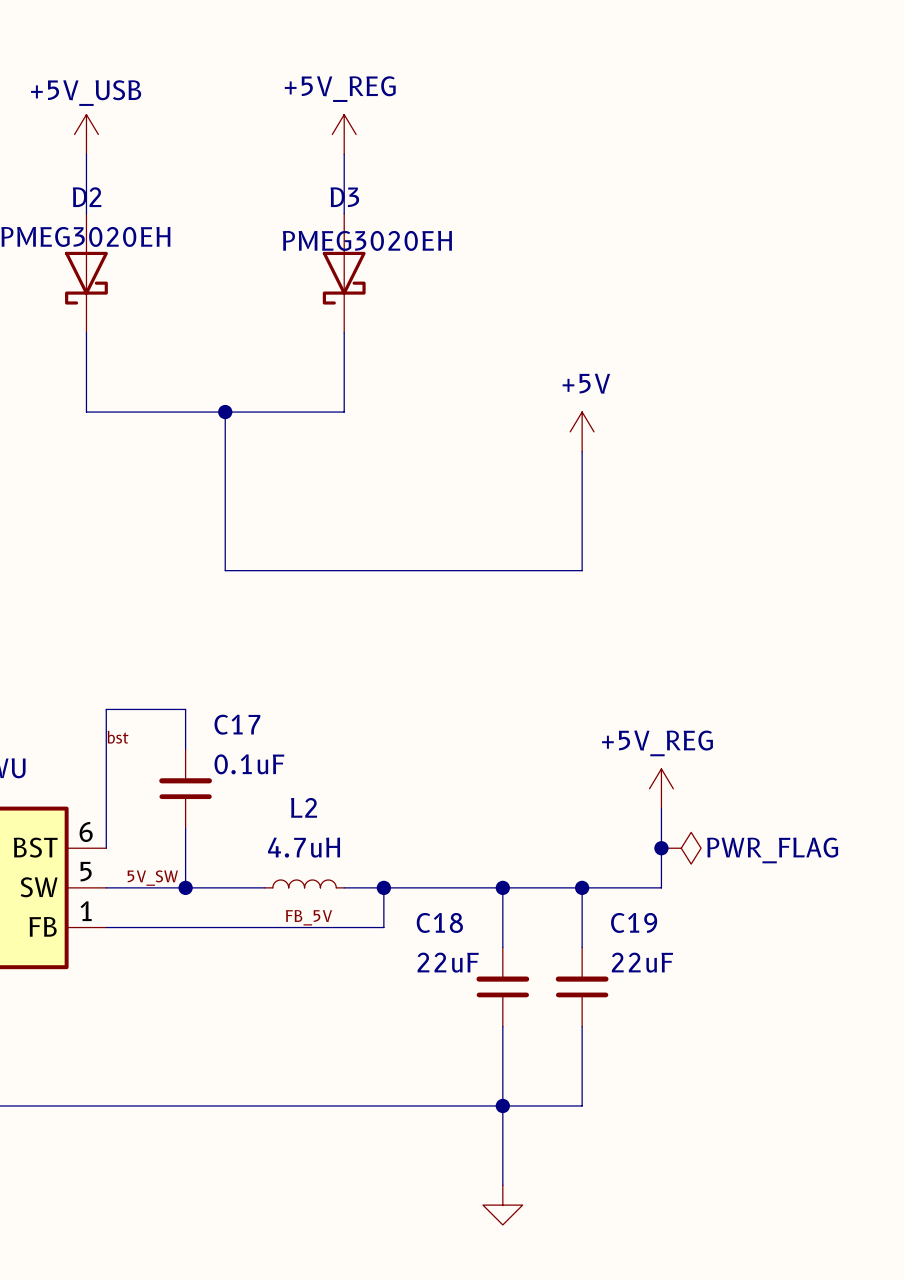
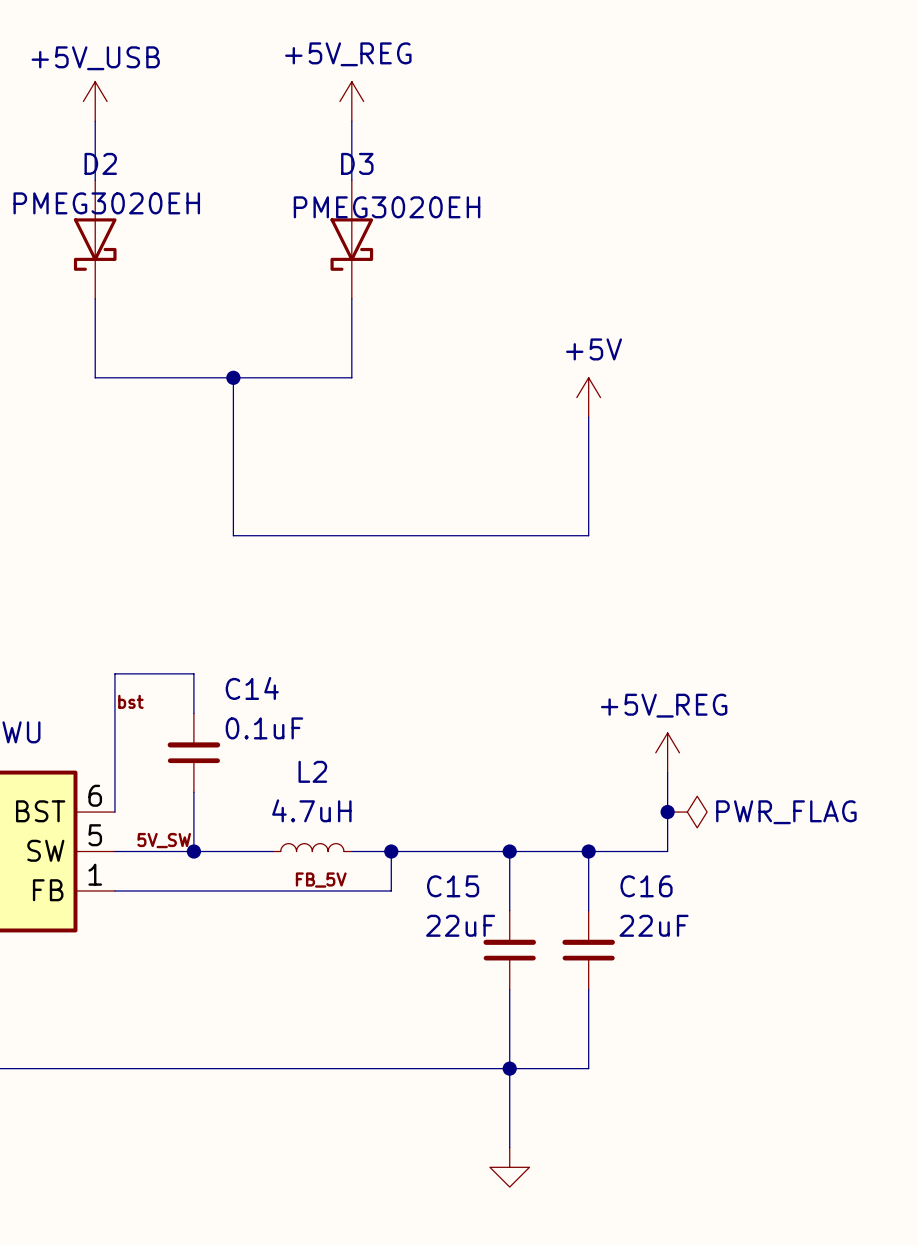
C17 name: C17 (237, 724) -> C14 (252, 688)
C18 name: C18 (439, 922) -> C15 (453, 886)
C19 name: C19 (634, 922) -> C16 (646, 886)

